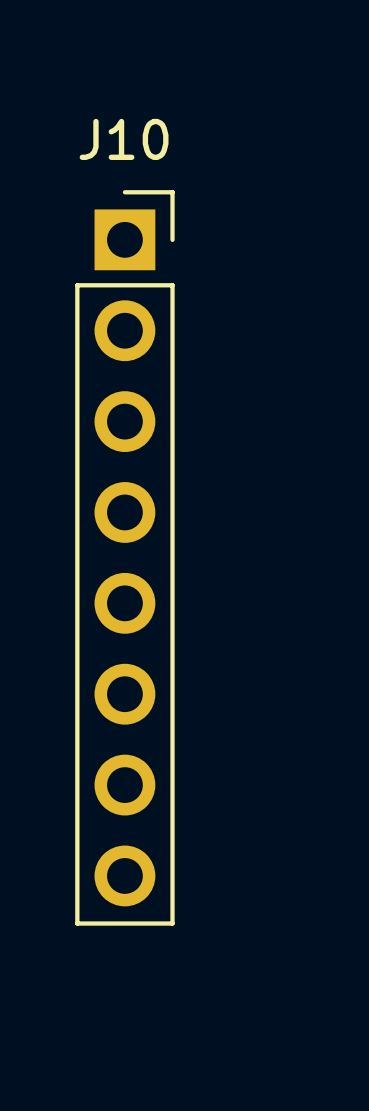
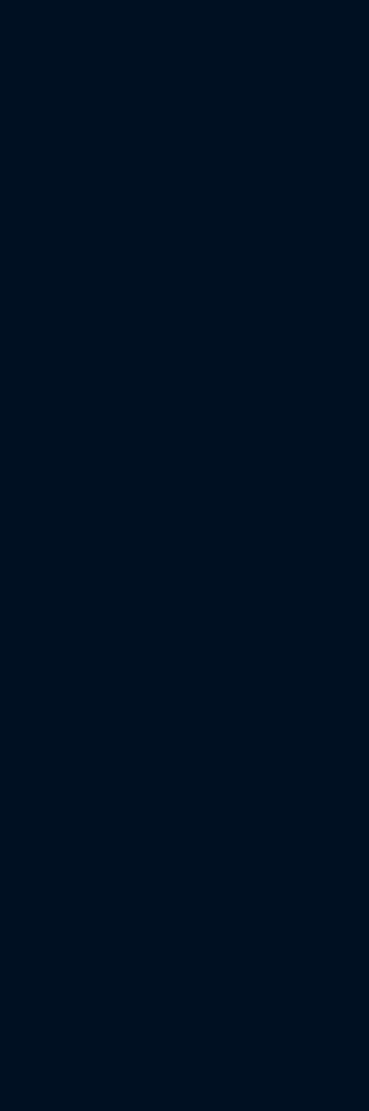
J10: (124, 557) -> none

